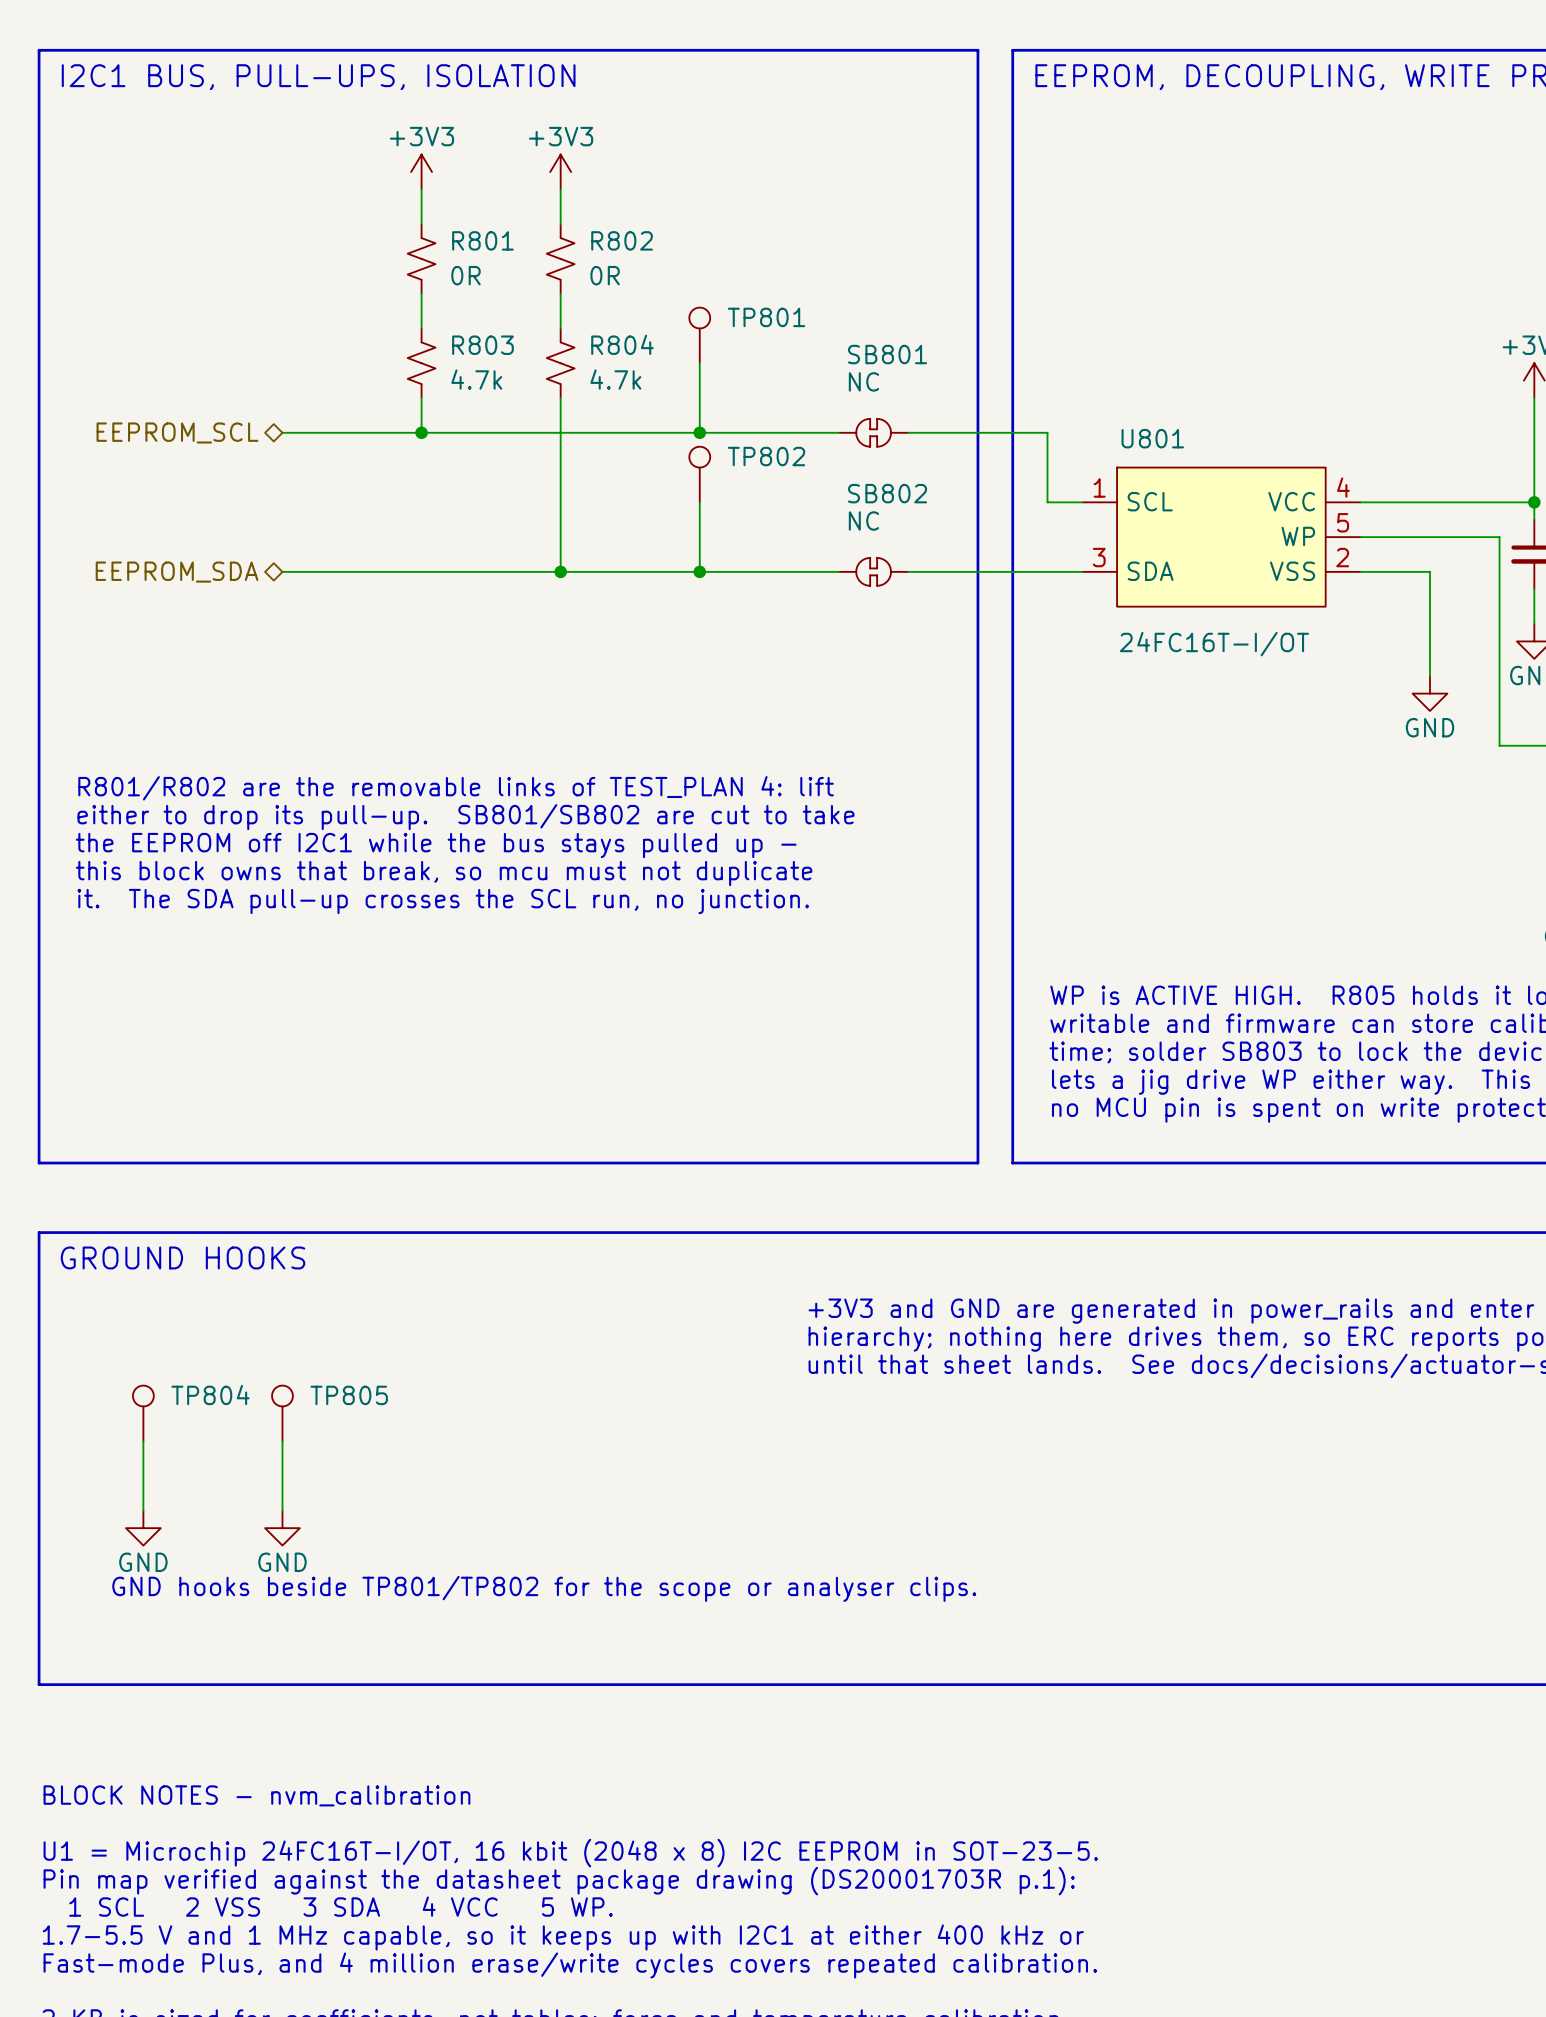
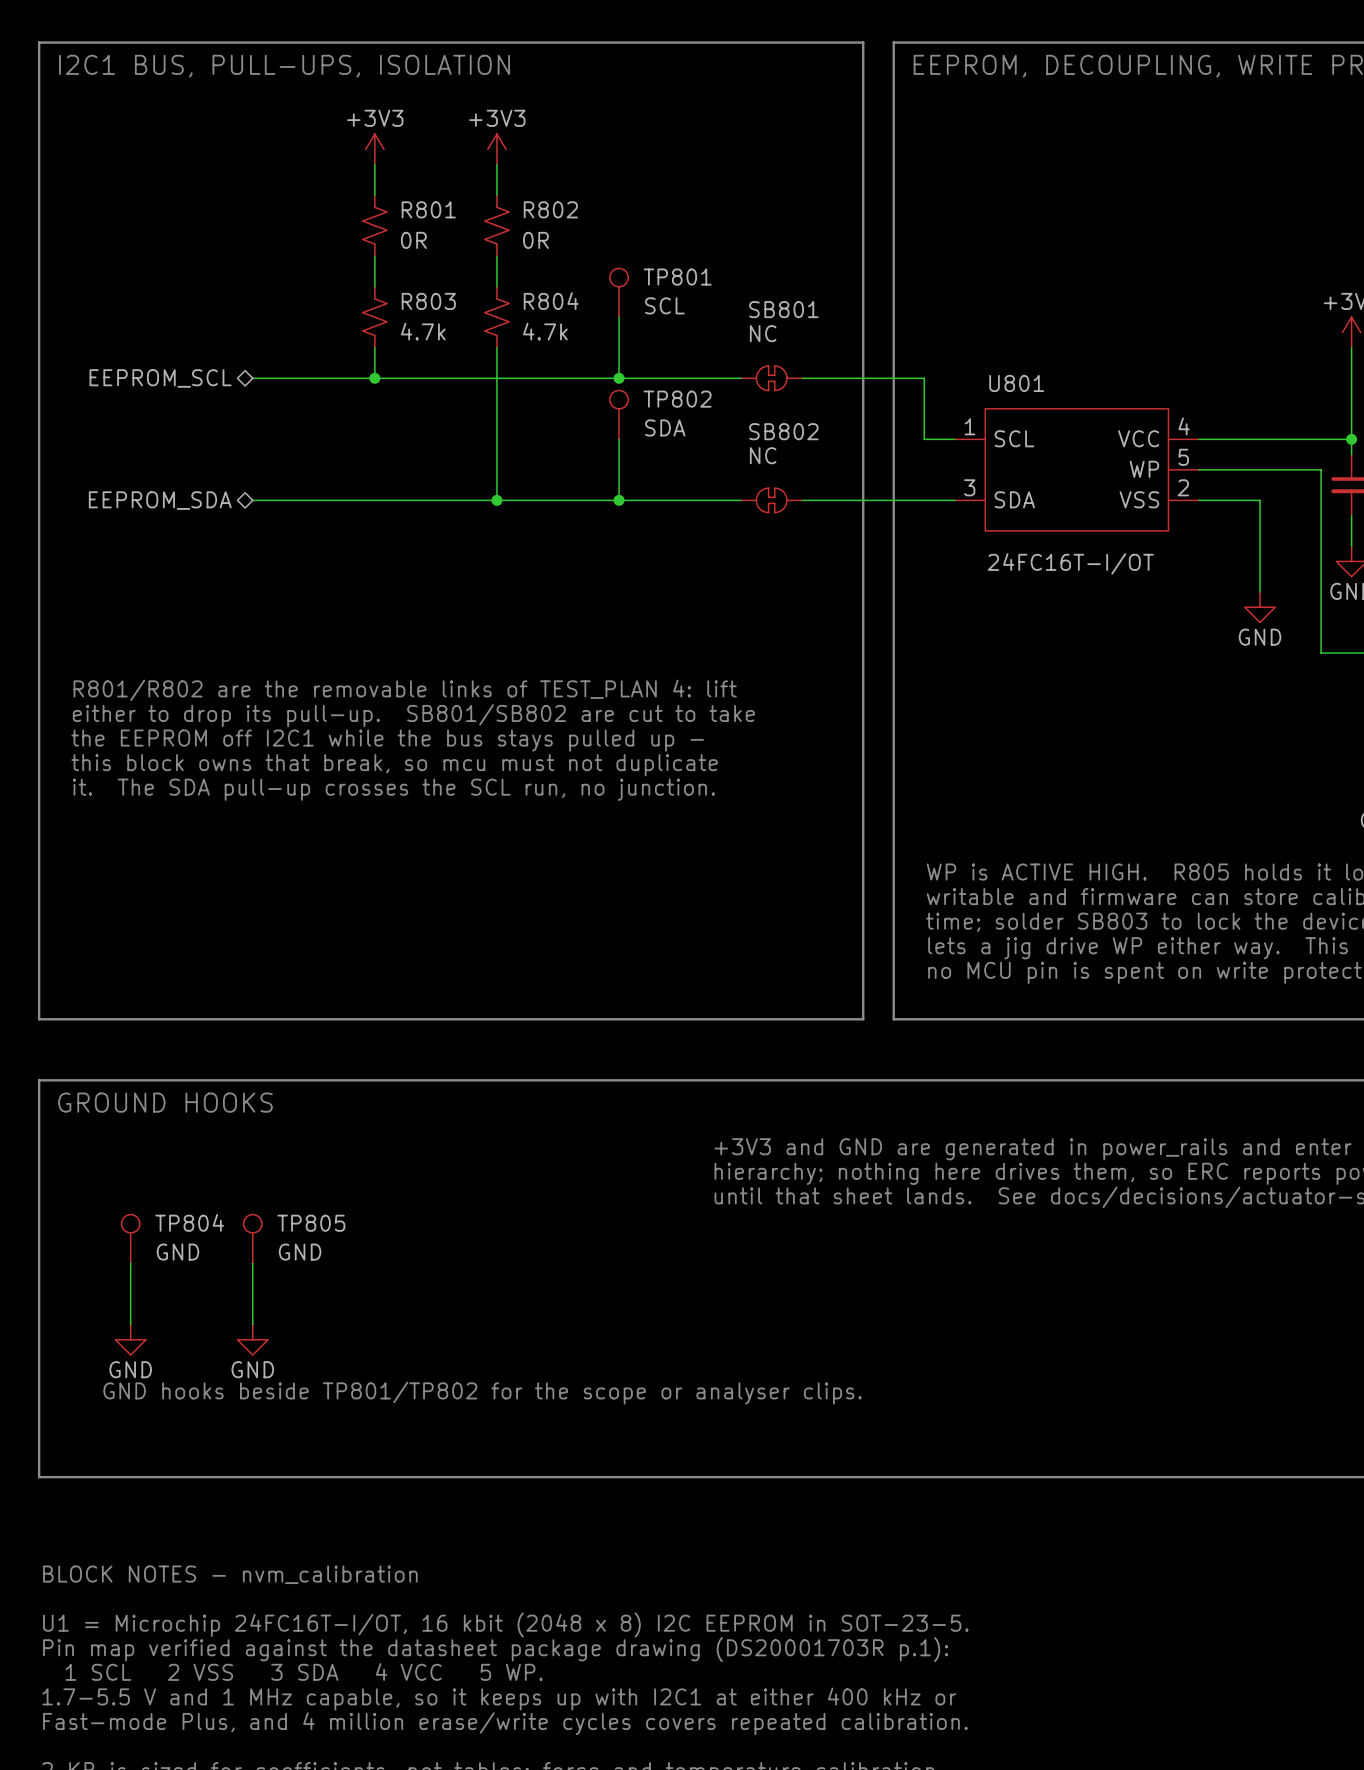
TP801 value: none -> SCL (664, 305)
TP802 value: none -> SDA (665, 427)
TP804 value: none -> GND (177, 1252)
TP805 value: none -> GND (300, 1252)

